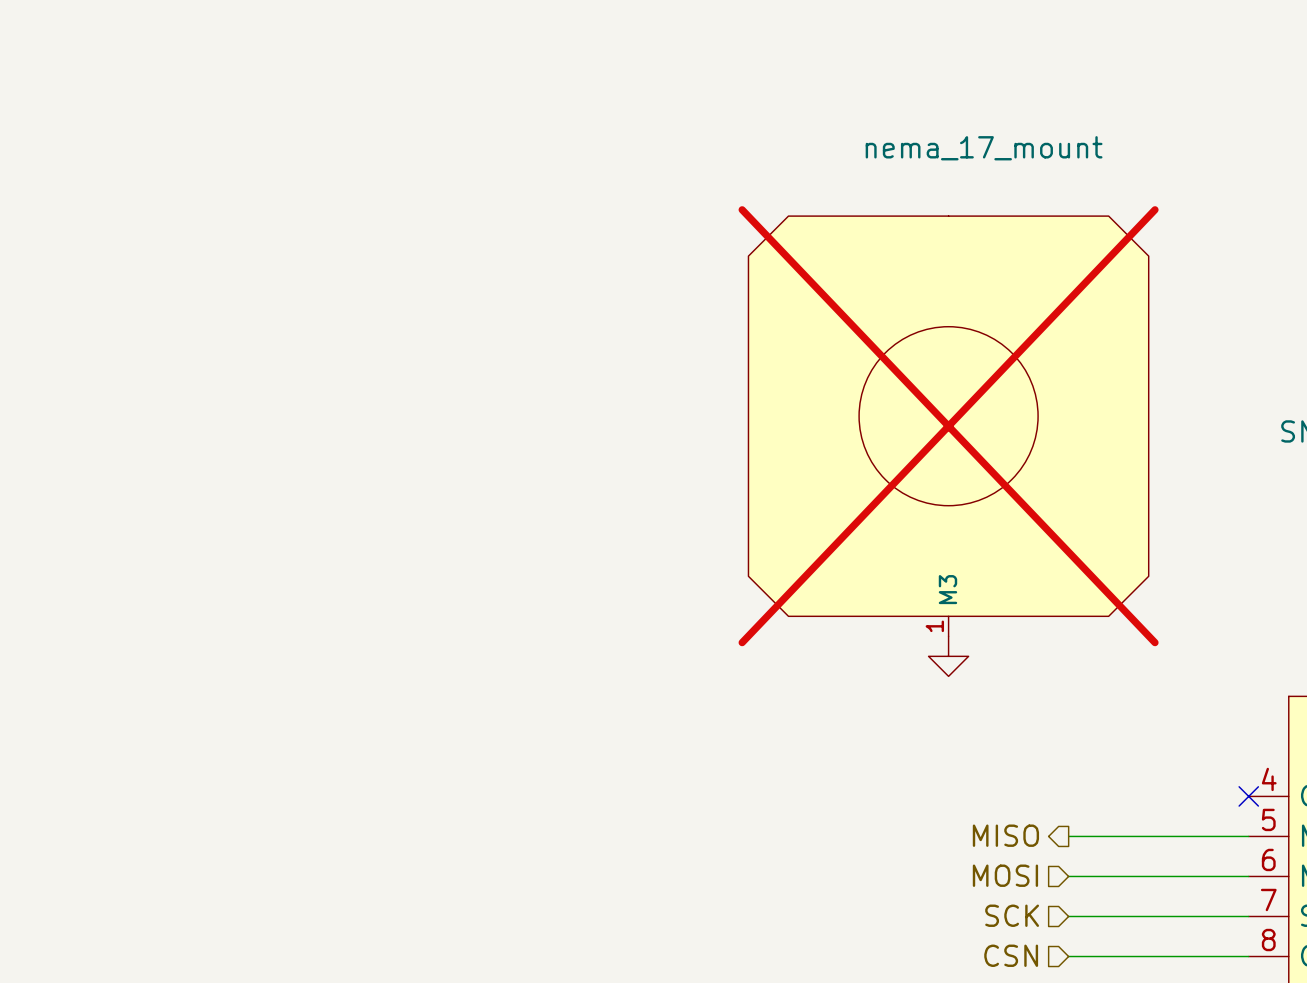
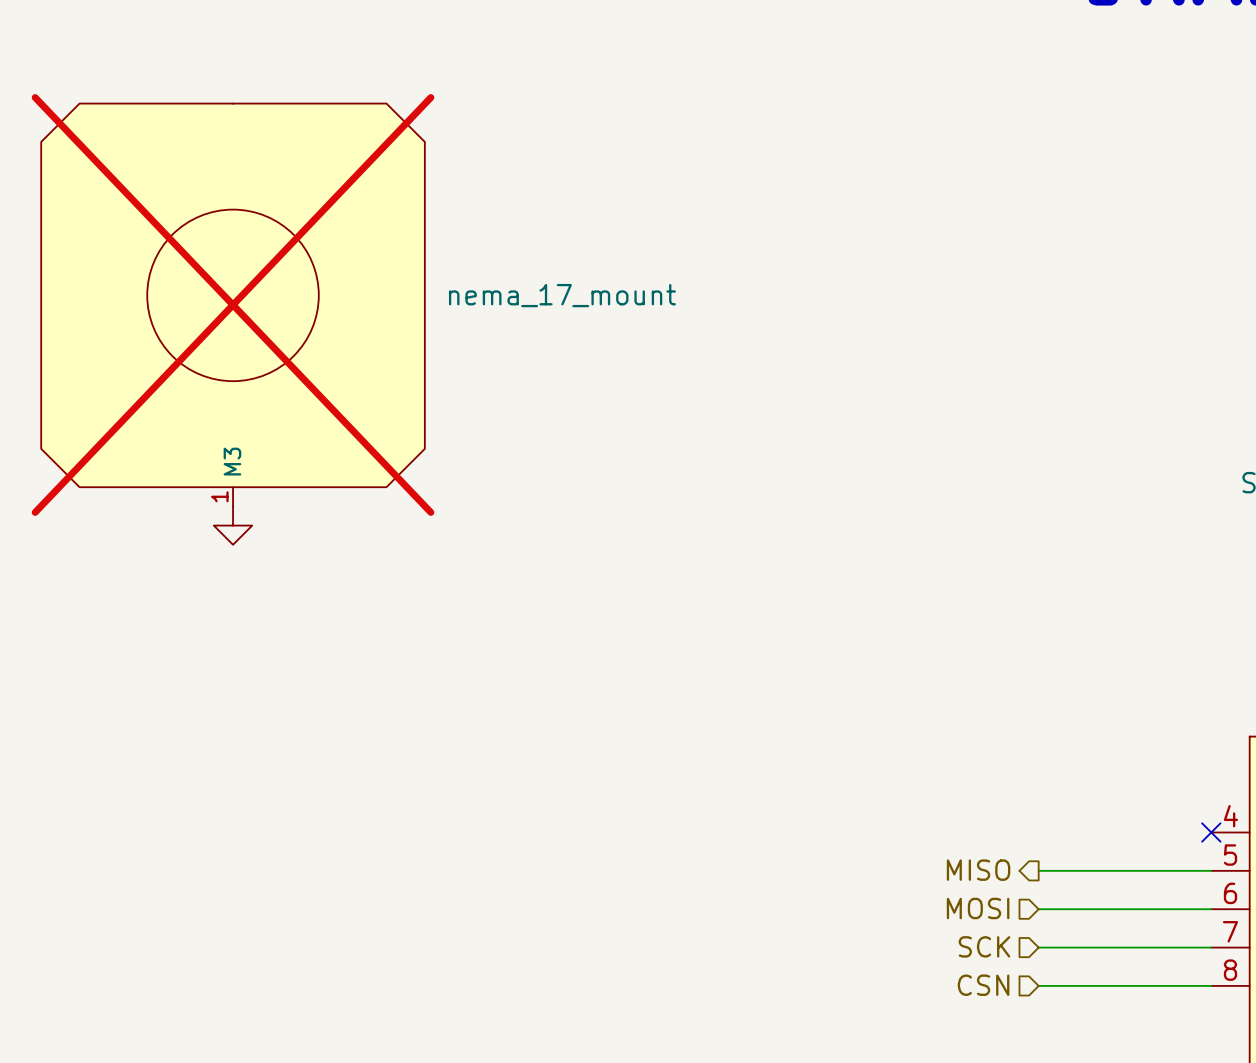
part: none -> nema_17_mount (233, 304)
part: nema_17_mount (948, 426) -> none
power symbol: none -> (233, 525)
power symbol: (948, 656) -> none

